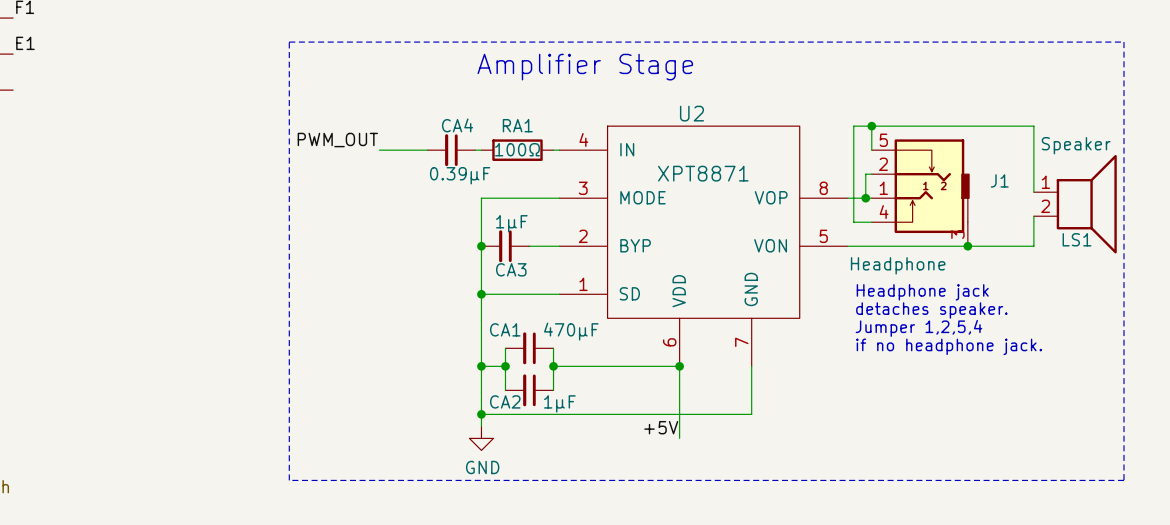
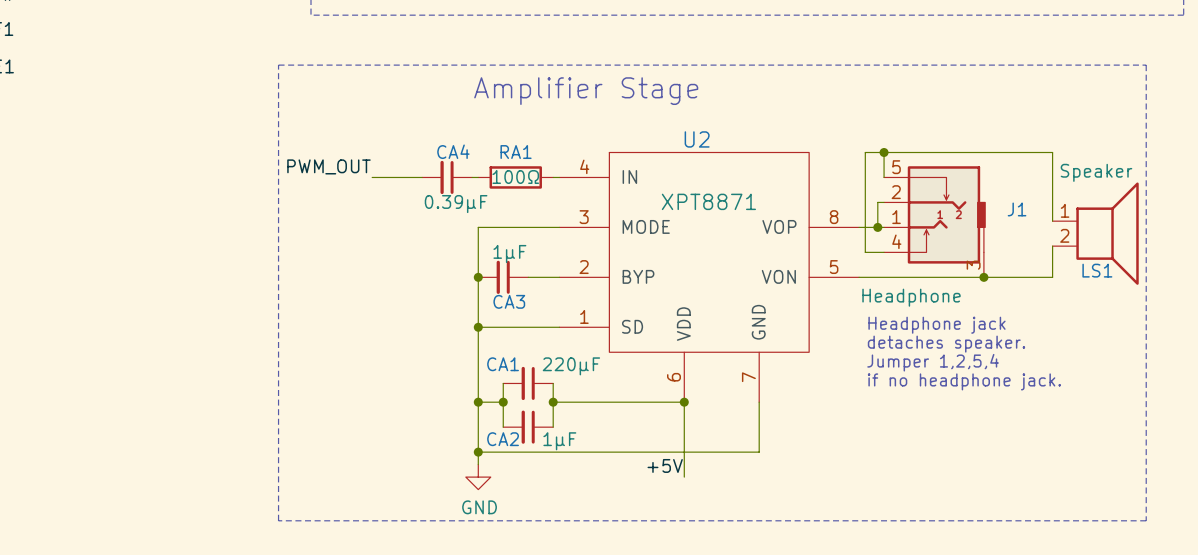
CA1 value: 470μF (571, 331) -> 220µF (571, 366)

